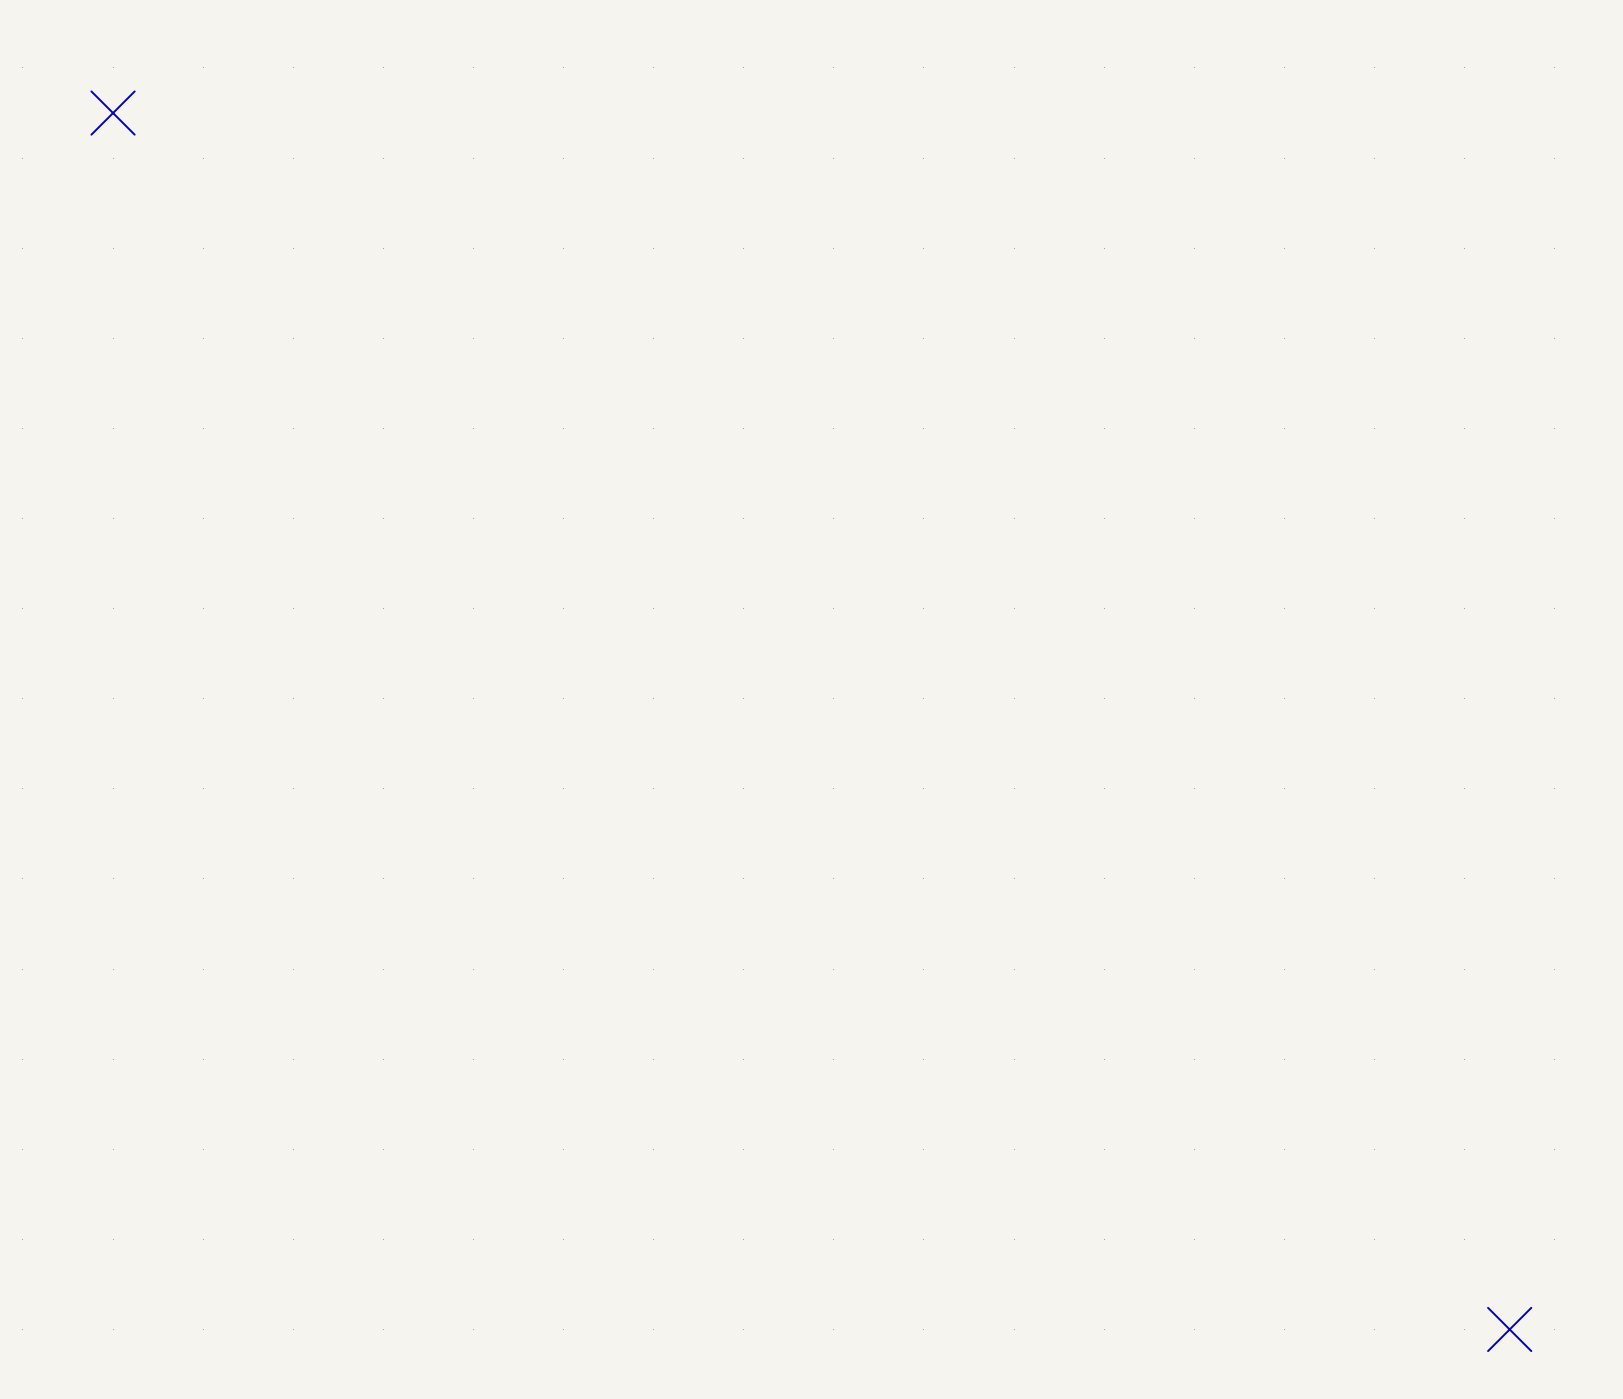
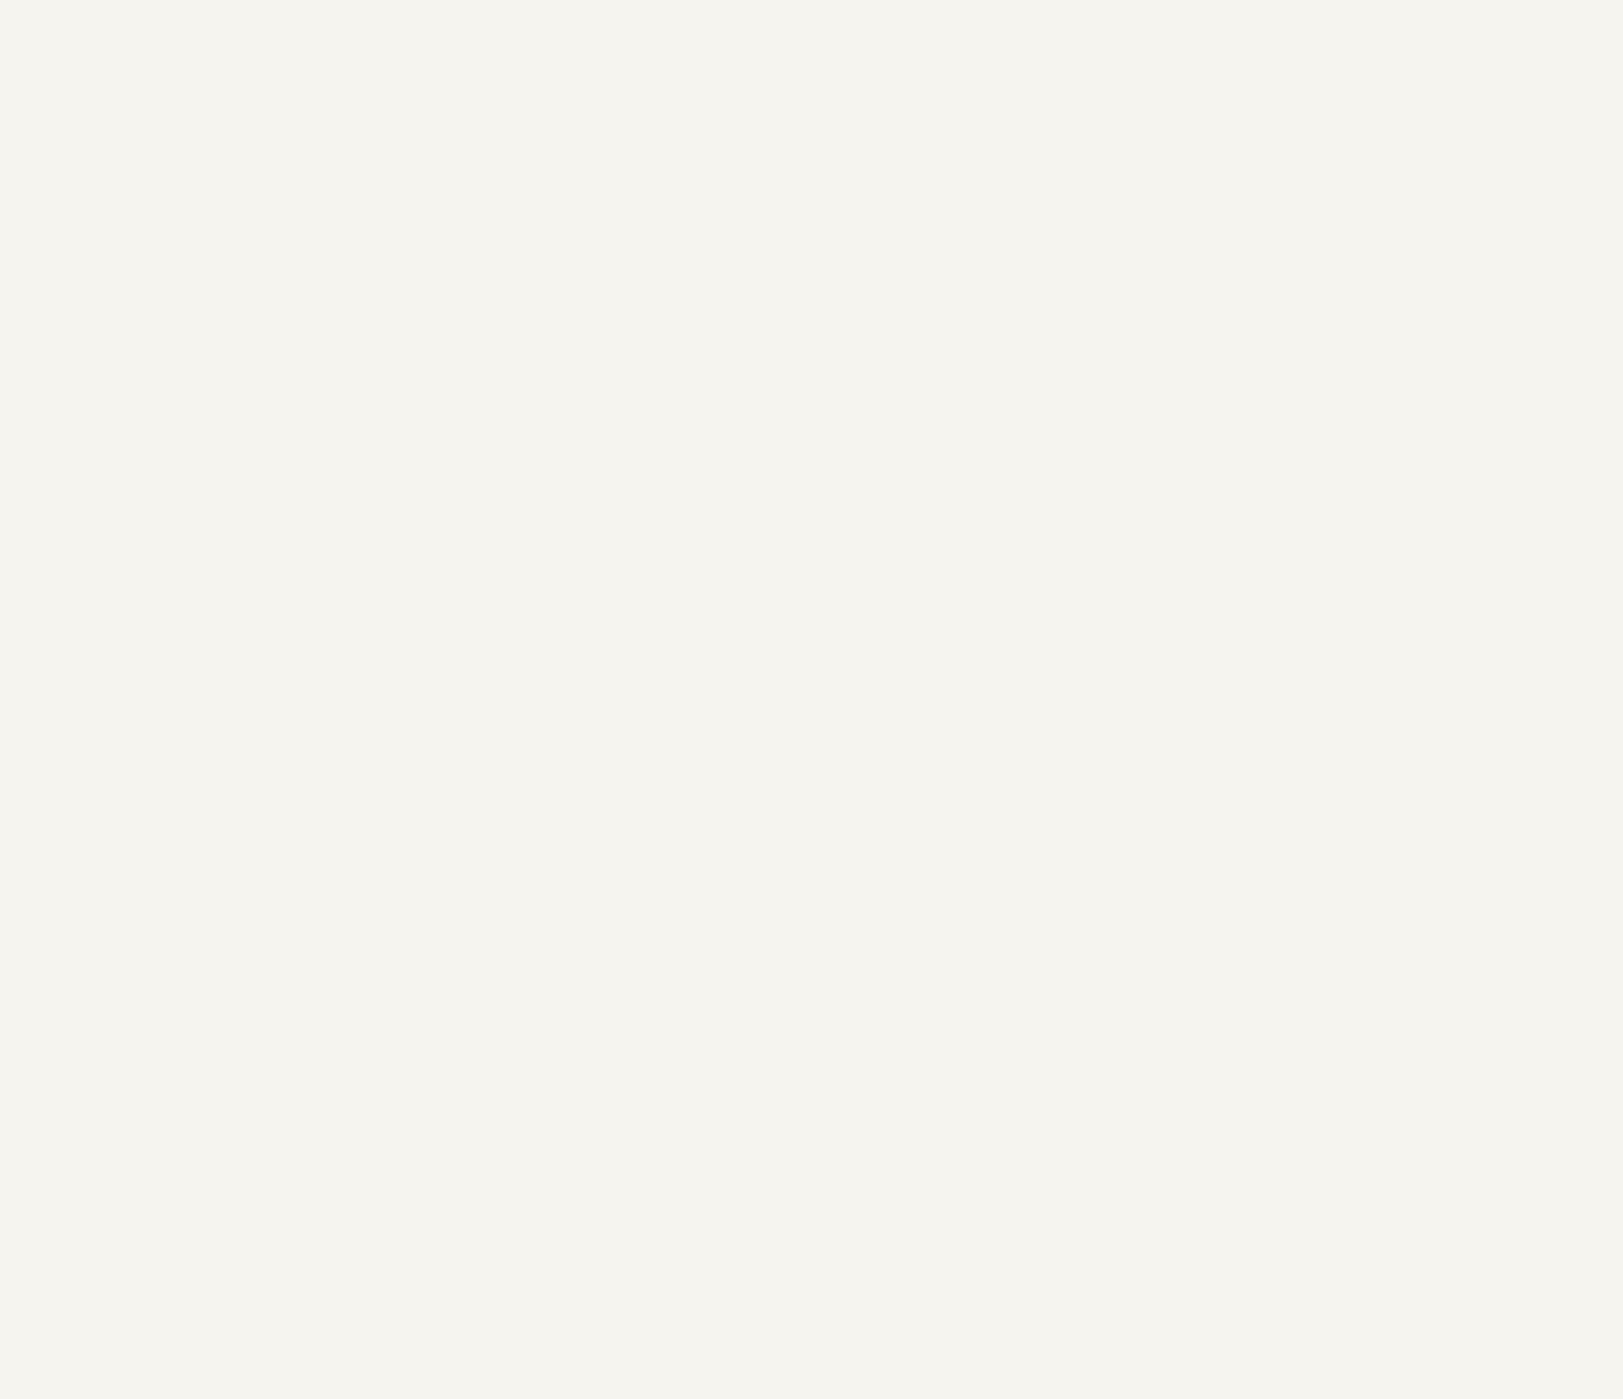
no-connect mark: (113, 113) -> none
no-connect mark: (1509, 1329) -> none

